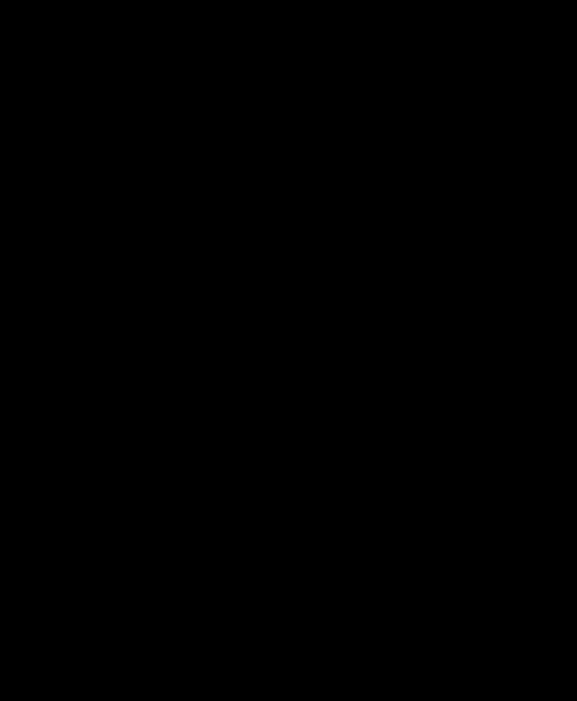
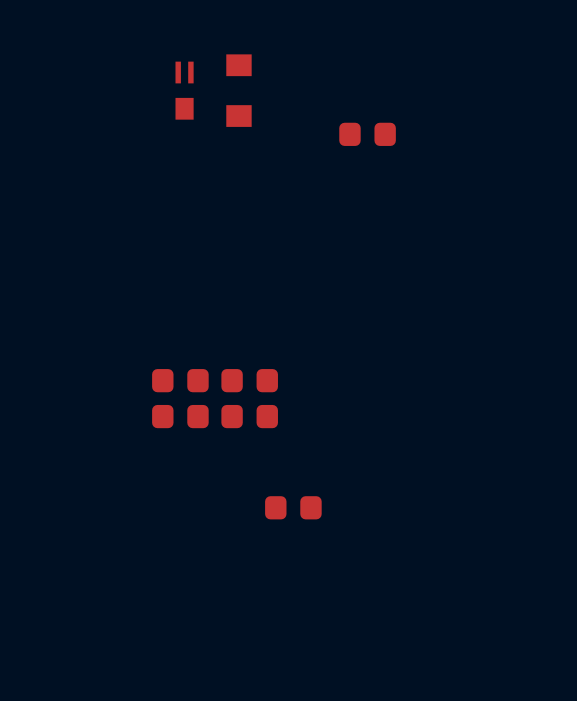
part: none -> (184, 90)
part: none -> (238, 90)
part: none -> (367, 134)
part: none -> (180, 380)
part: none -> (249, 380)
part: none -> (180, 416)
part: none -> (249, 416)
part: none -> (293, 507)

